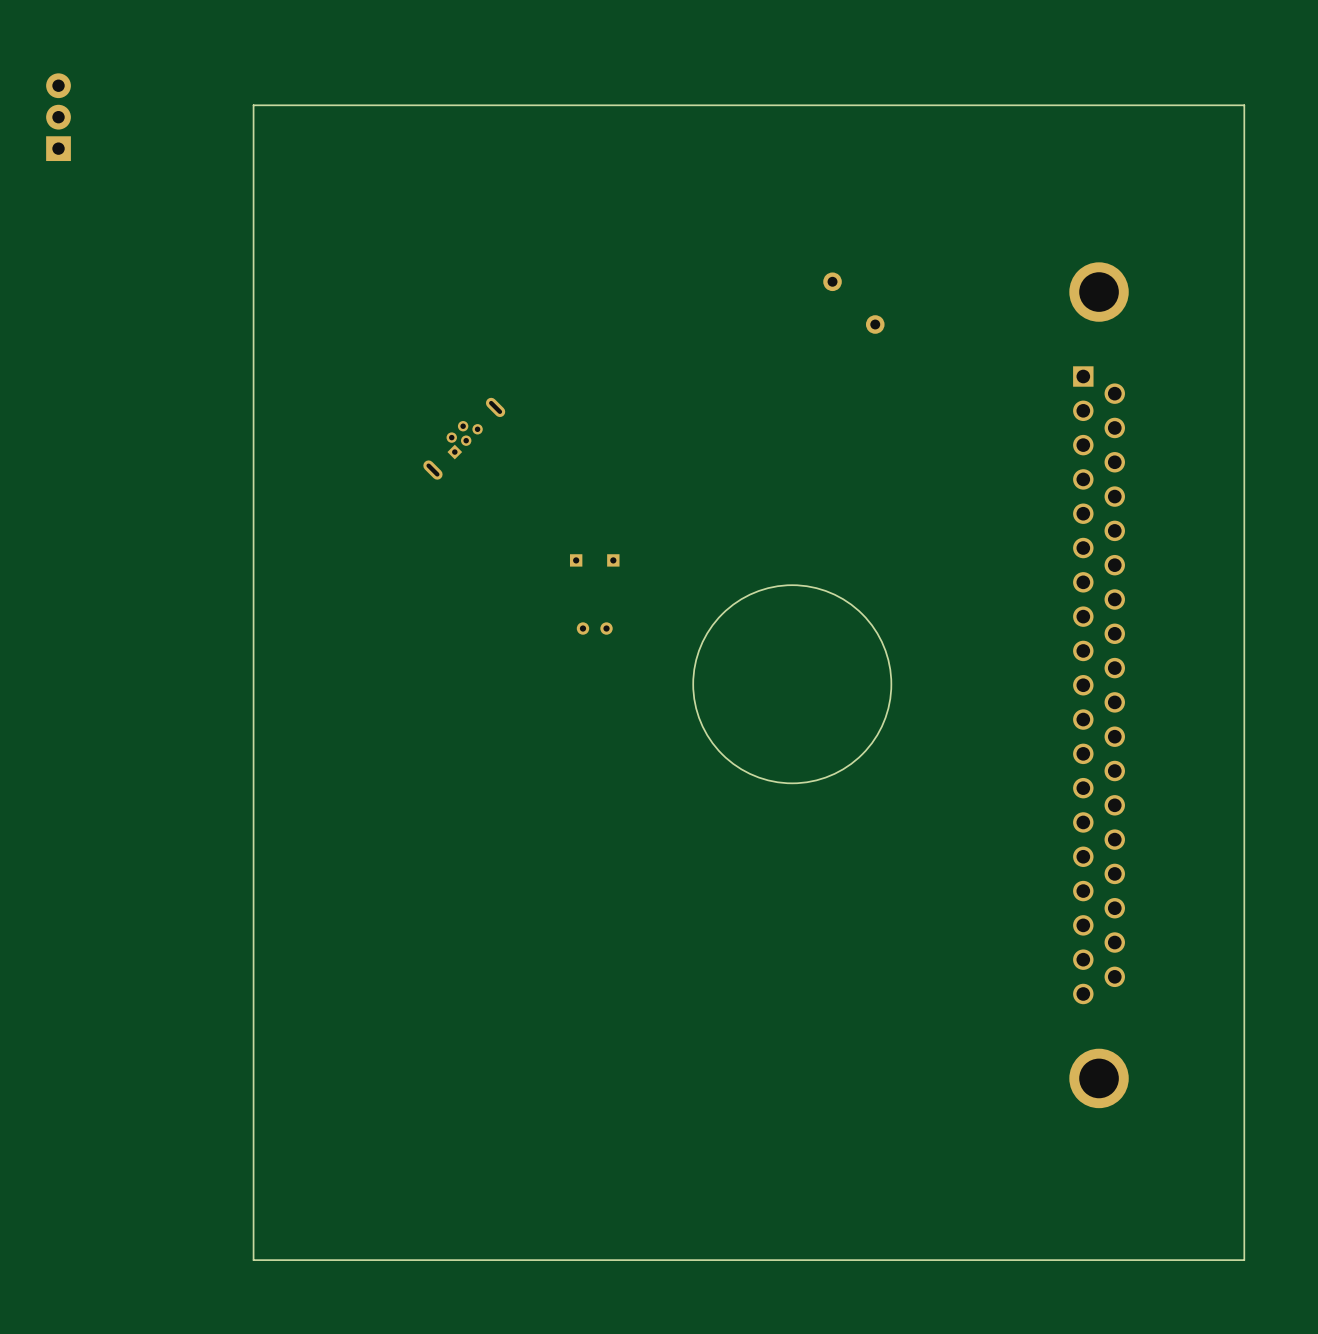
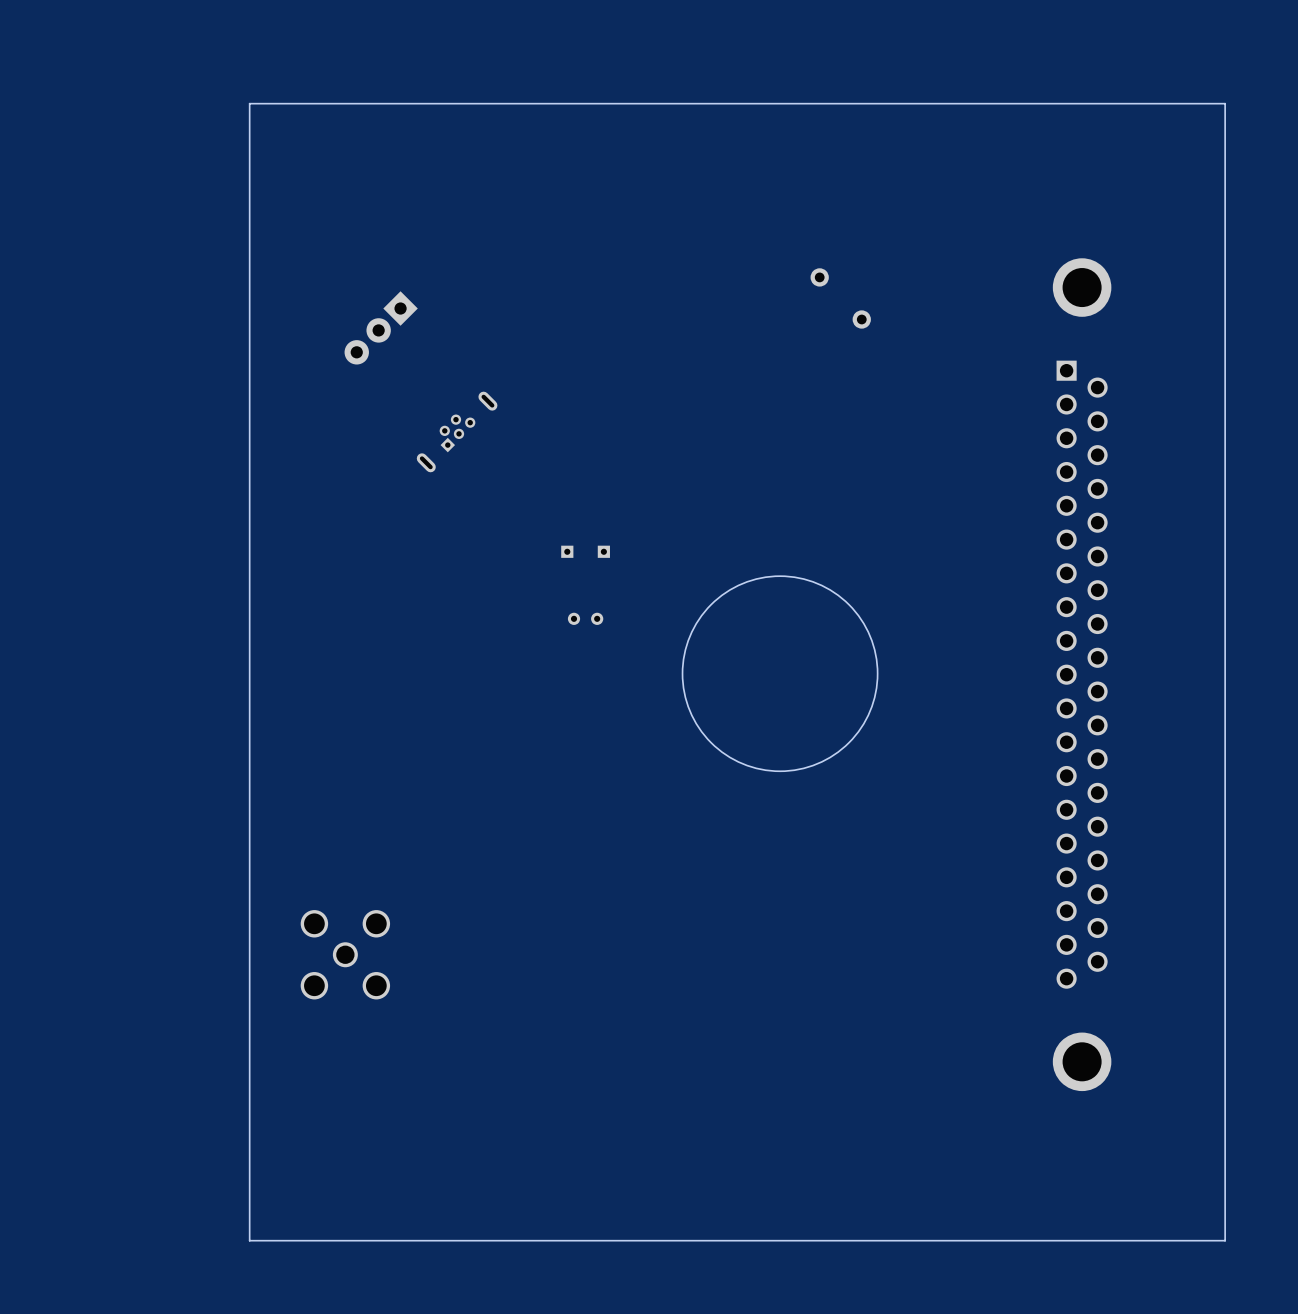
part: (58, 117) -> none
part: none -> (381, 327)
part: none -> (345, 954)

